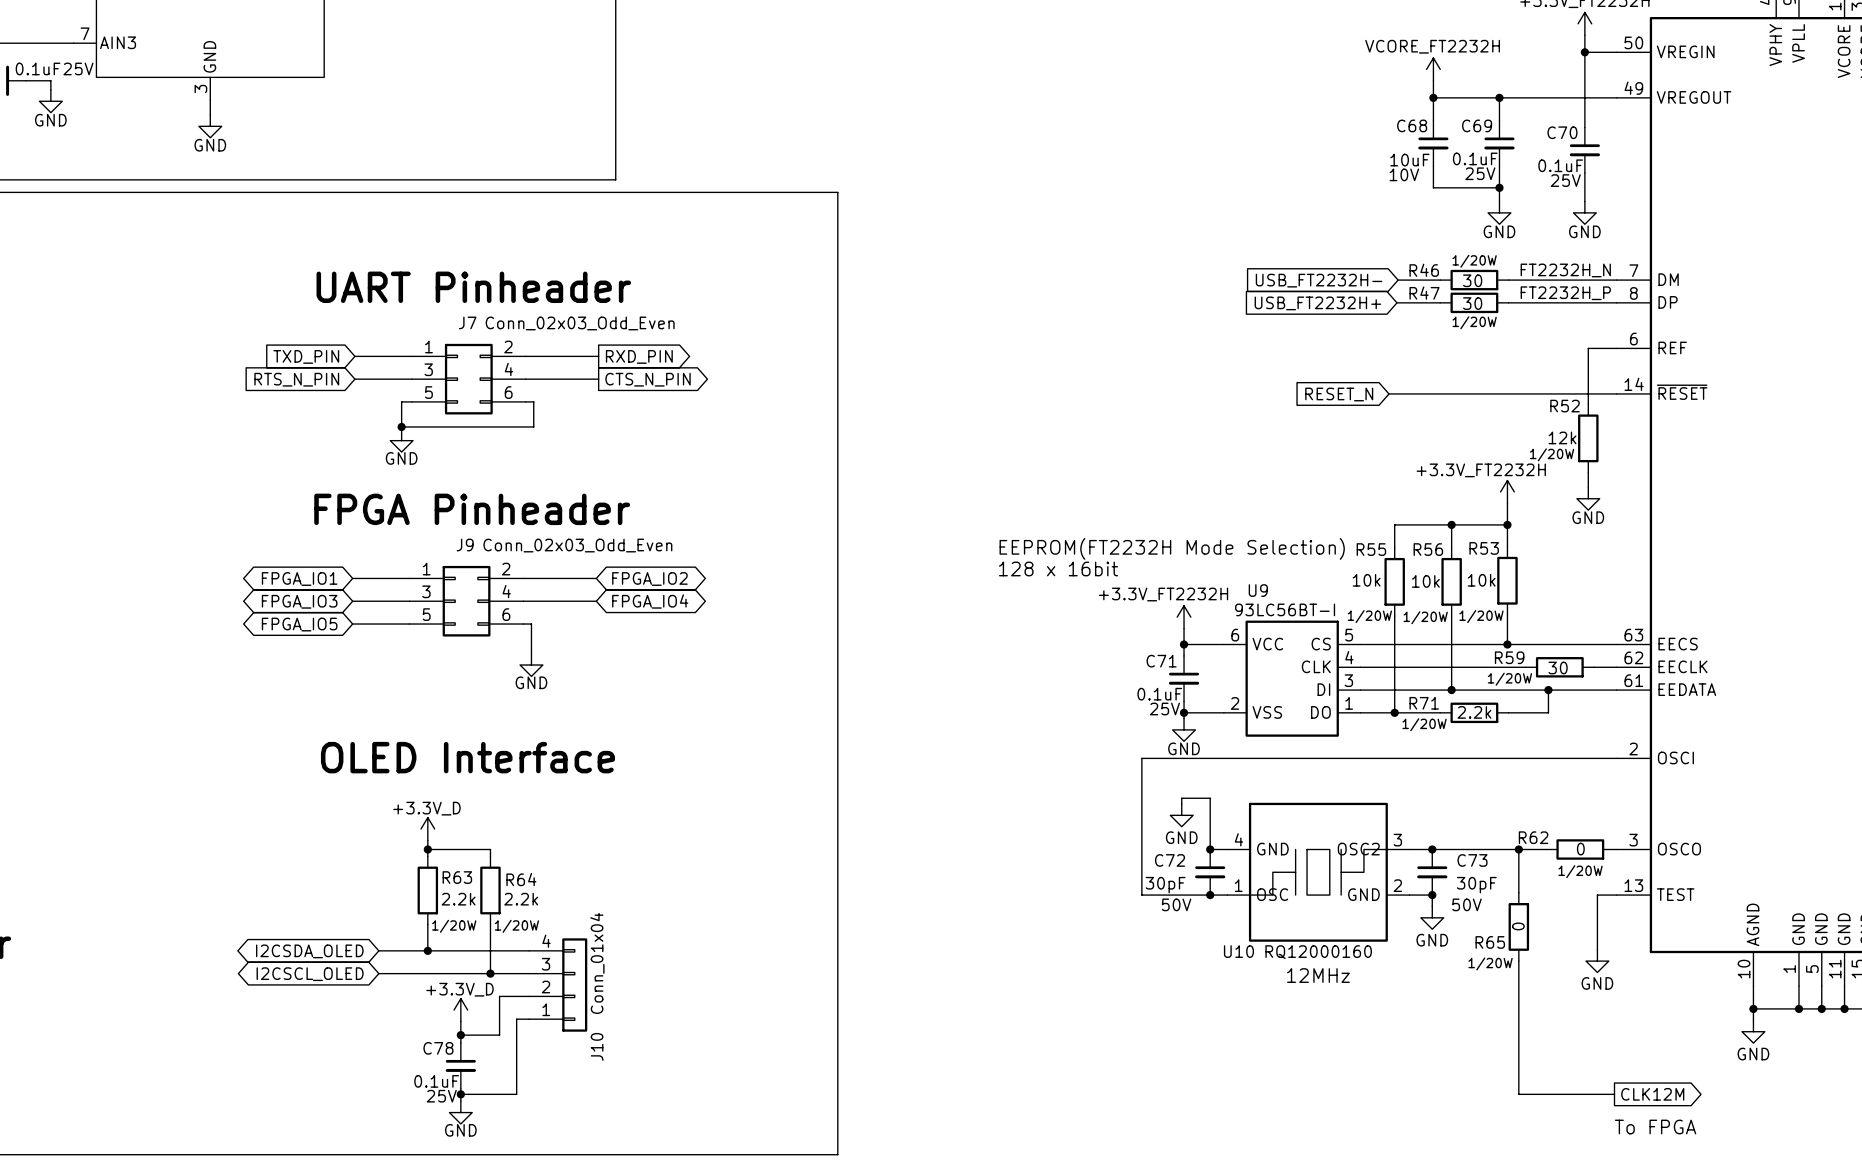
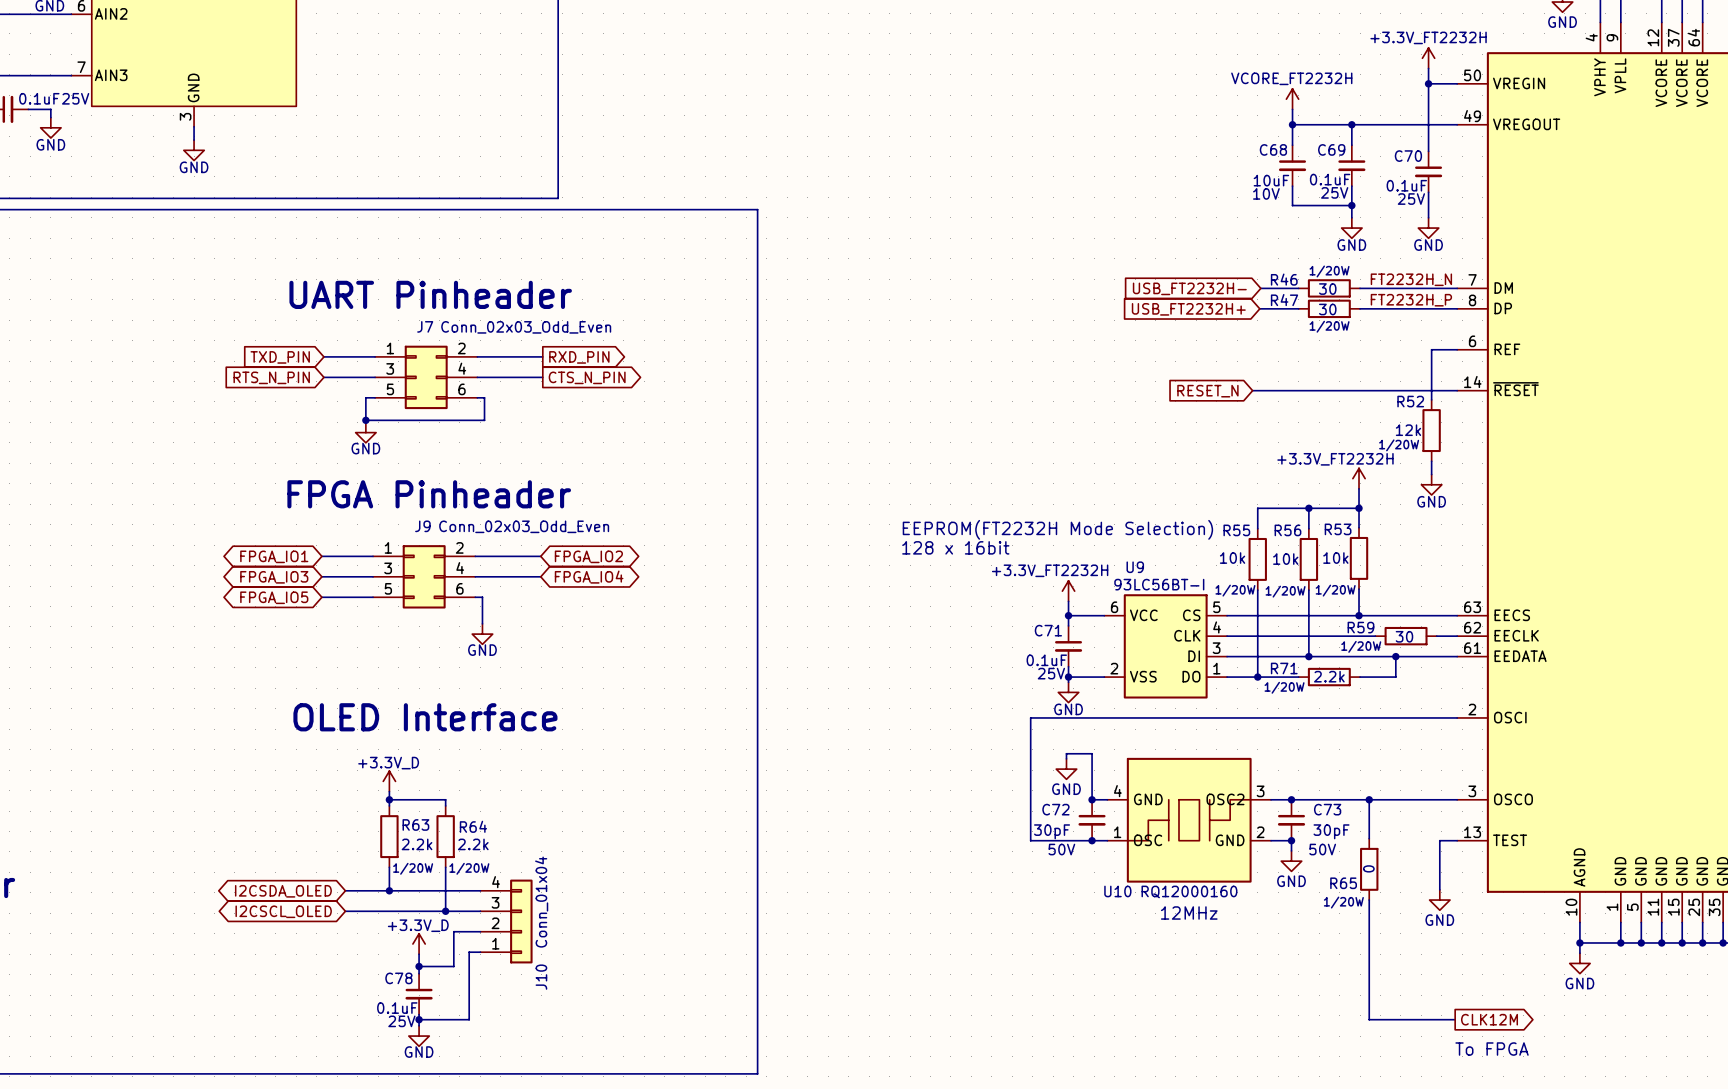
wire: none -> (1393, 799) (1455, 799)
R62: 0 (1580, 849) -> none

